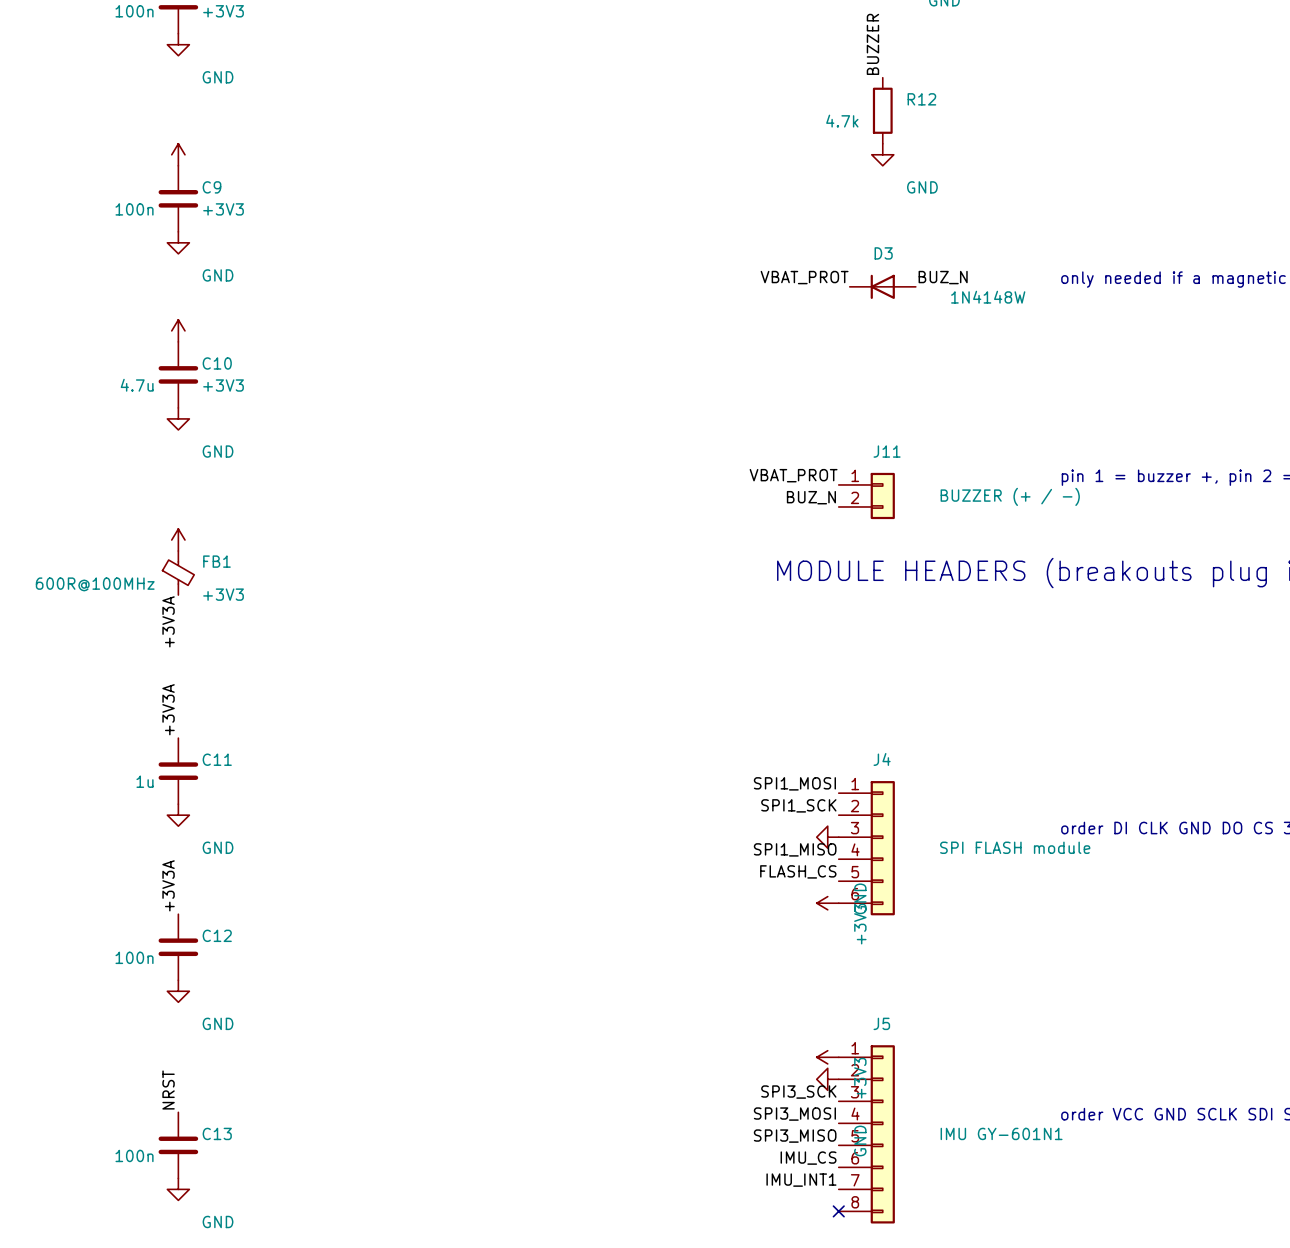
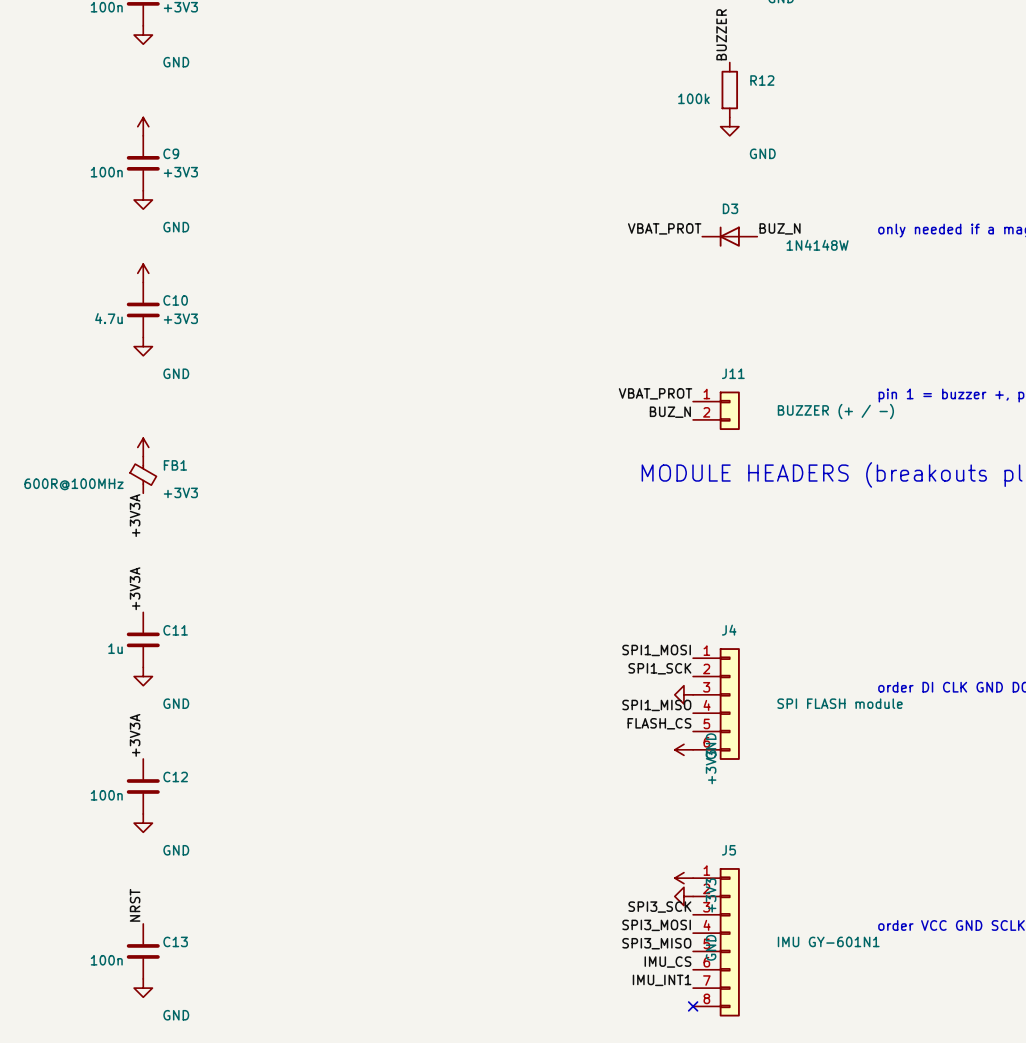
R12 value: 4.7k (842, 121) -> 100k (693, 98)

